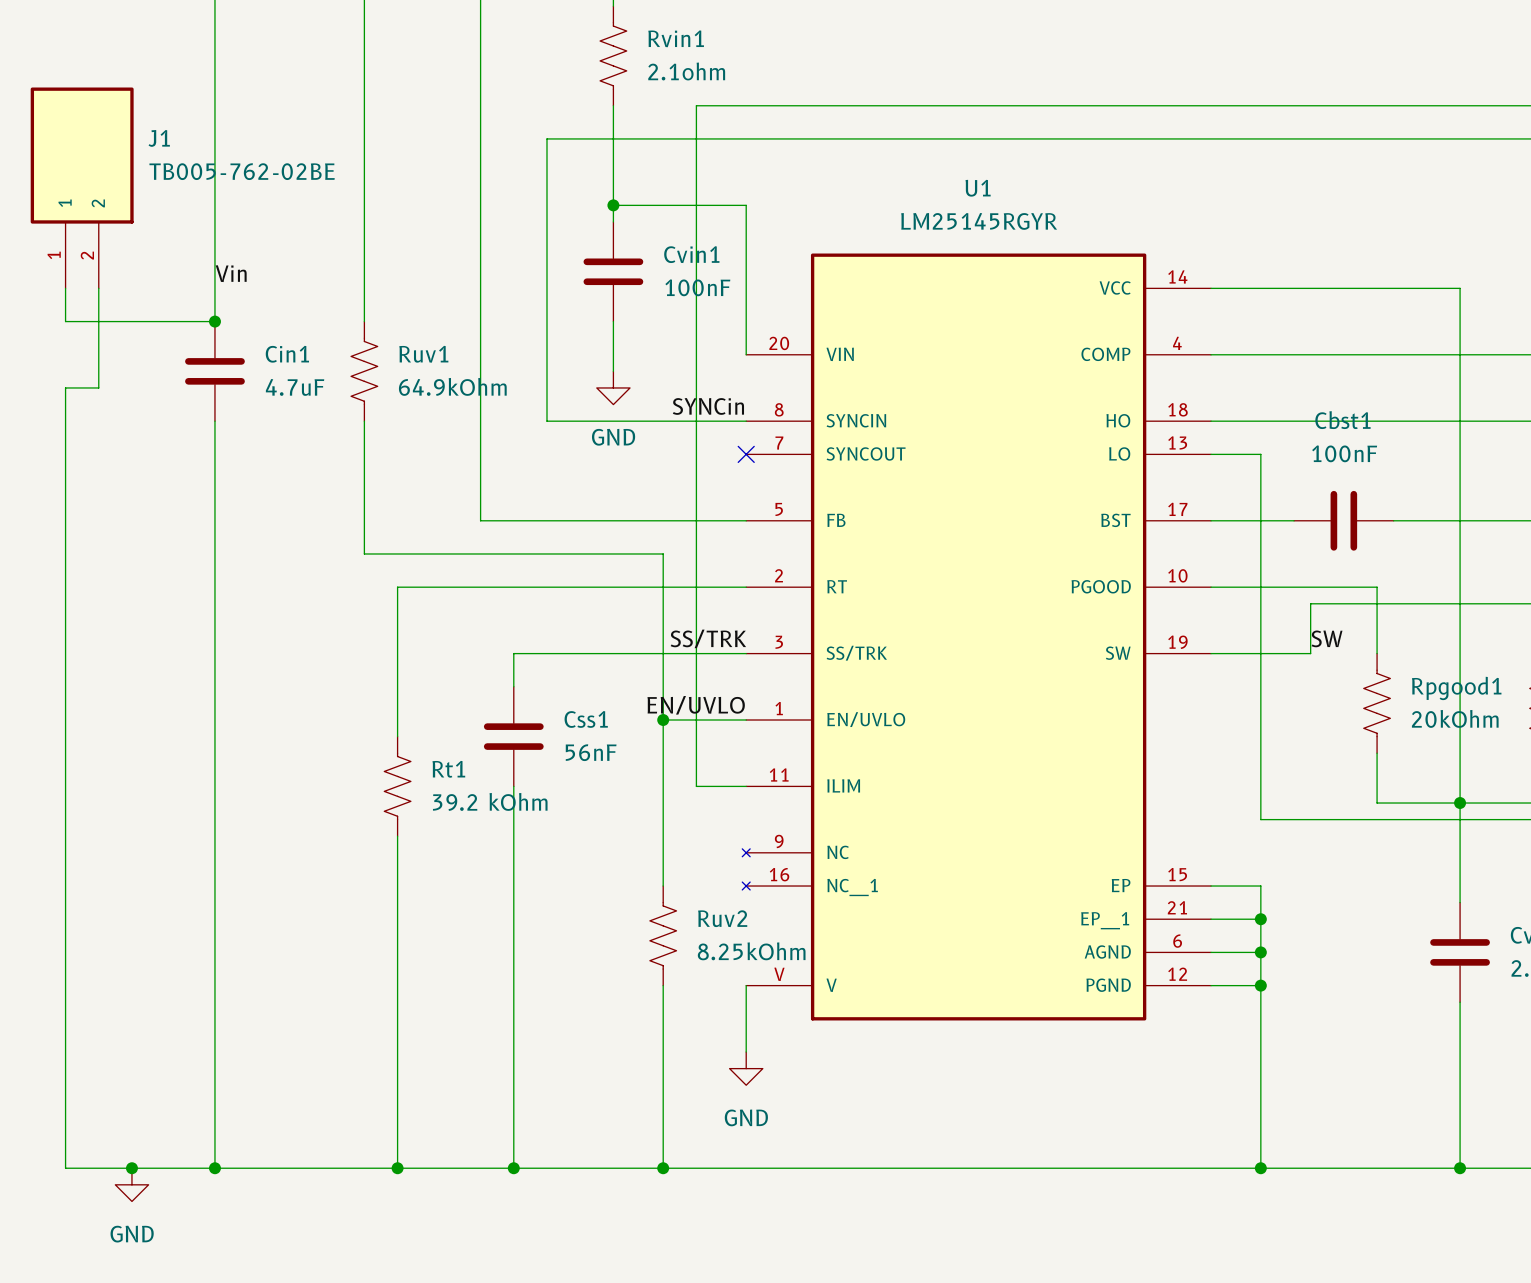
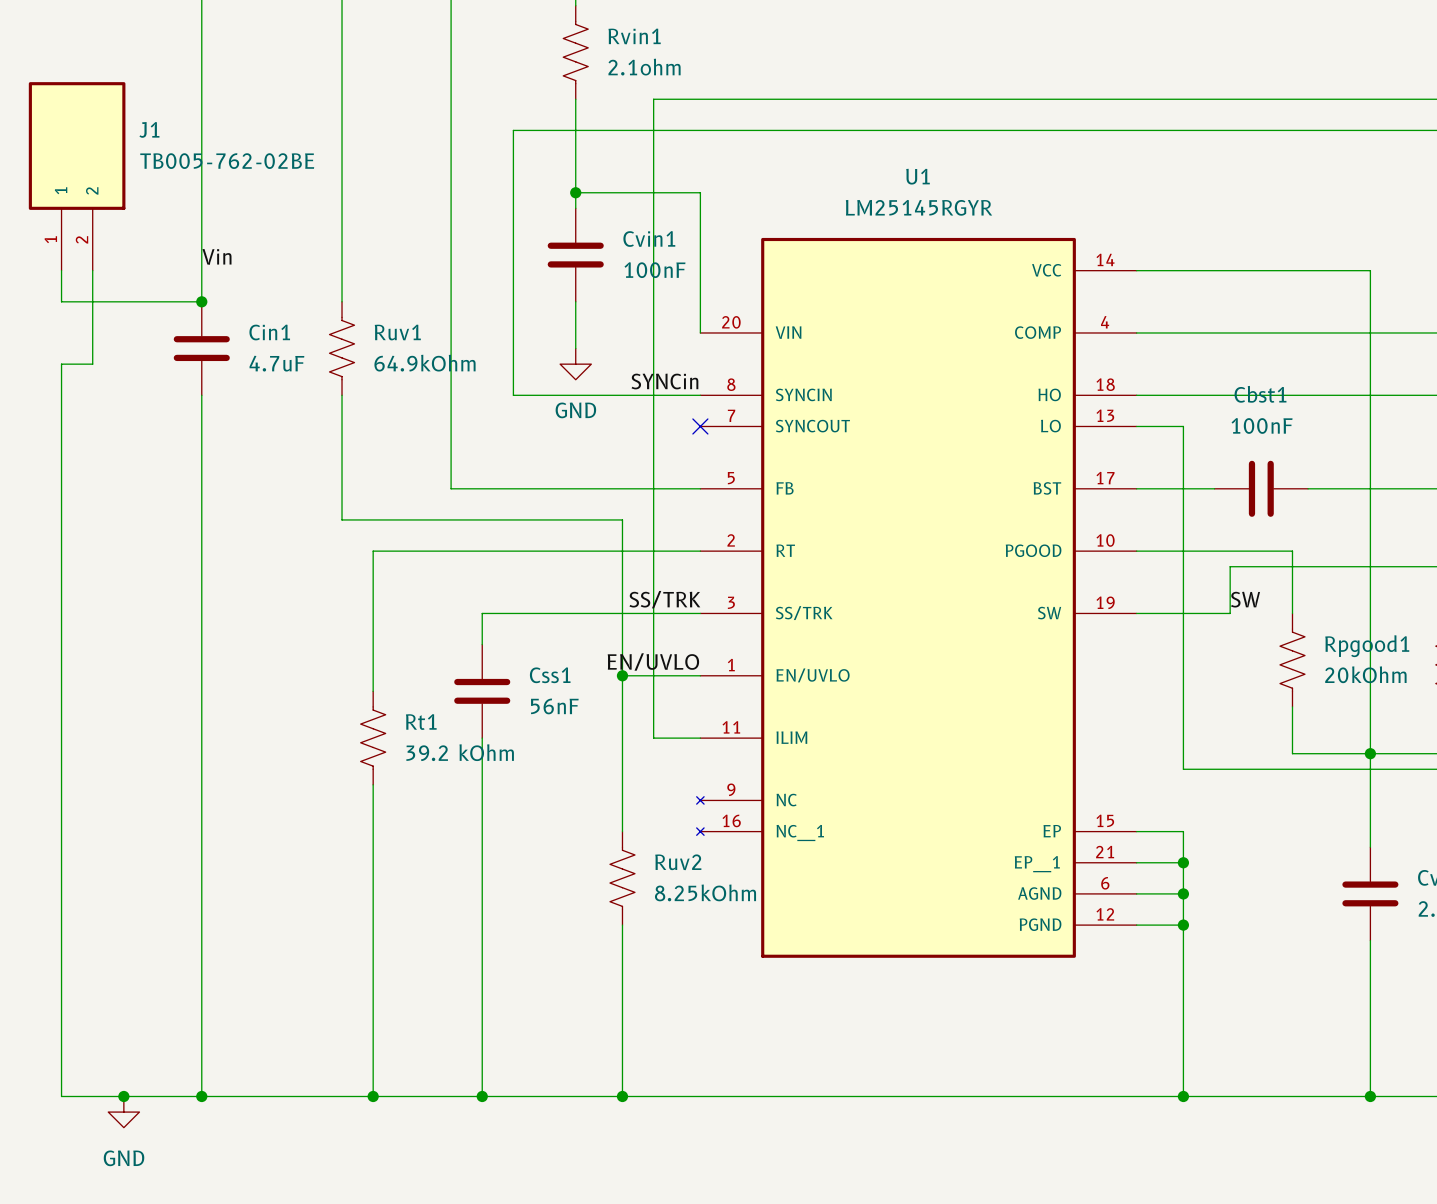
U1 symbol: [742, 253, 1212, 1021] -> [696, 237, 1137, 958]
wire: (746, 985) (746, 1052) -> none
power symbol: GND (746, 1068) -> none

